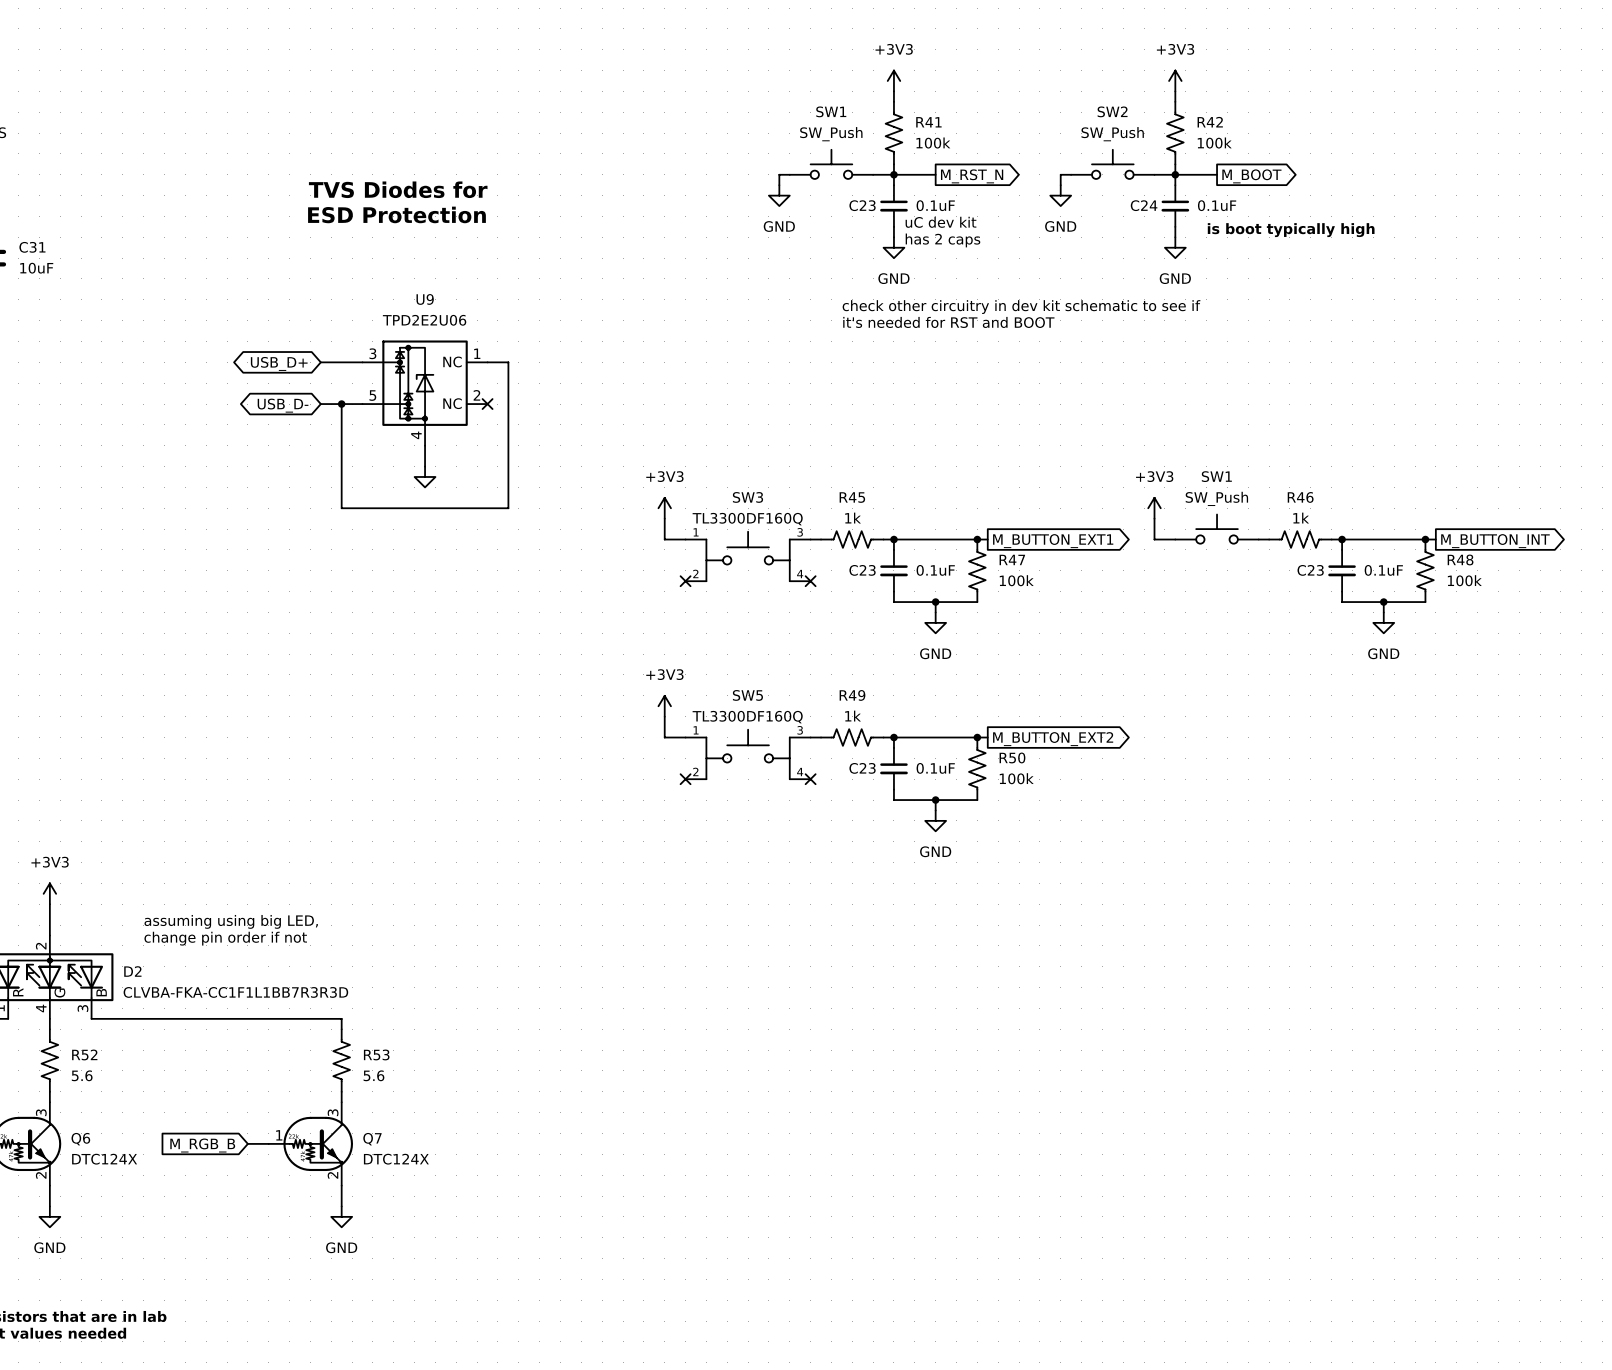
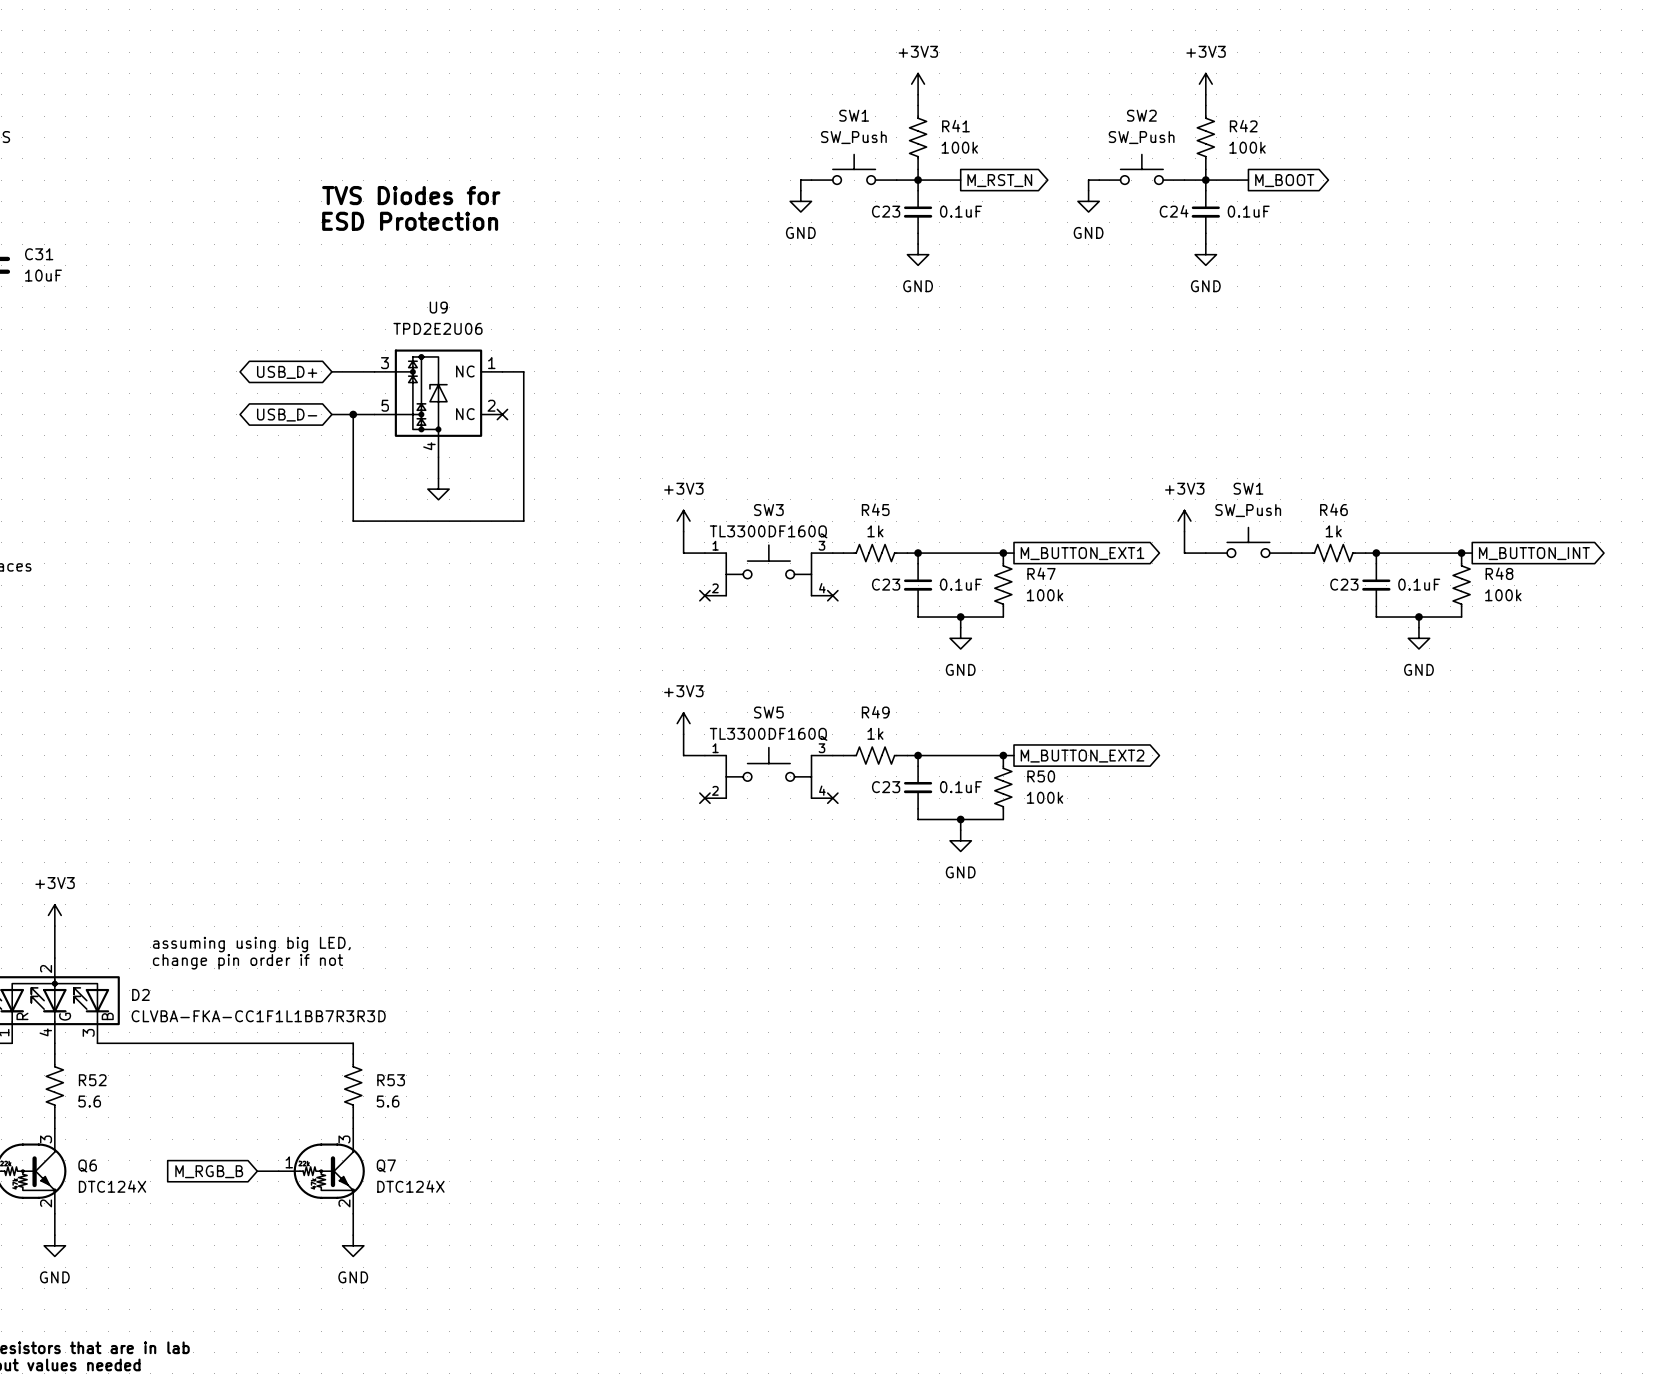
text: uC dev kit (940, 222) -> none
text: is boot typically high (1291, 230) -> none
text: has 2 caps (942, 240) -> none
text: check other circuitry in dev kit schematic to see if (1021, 307) -> none
text: it's needed for RST and BOOT (948, 322) -> none

